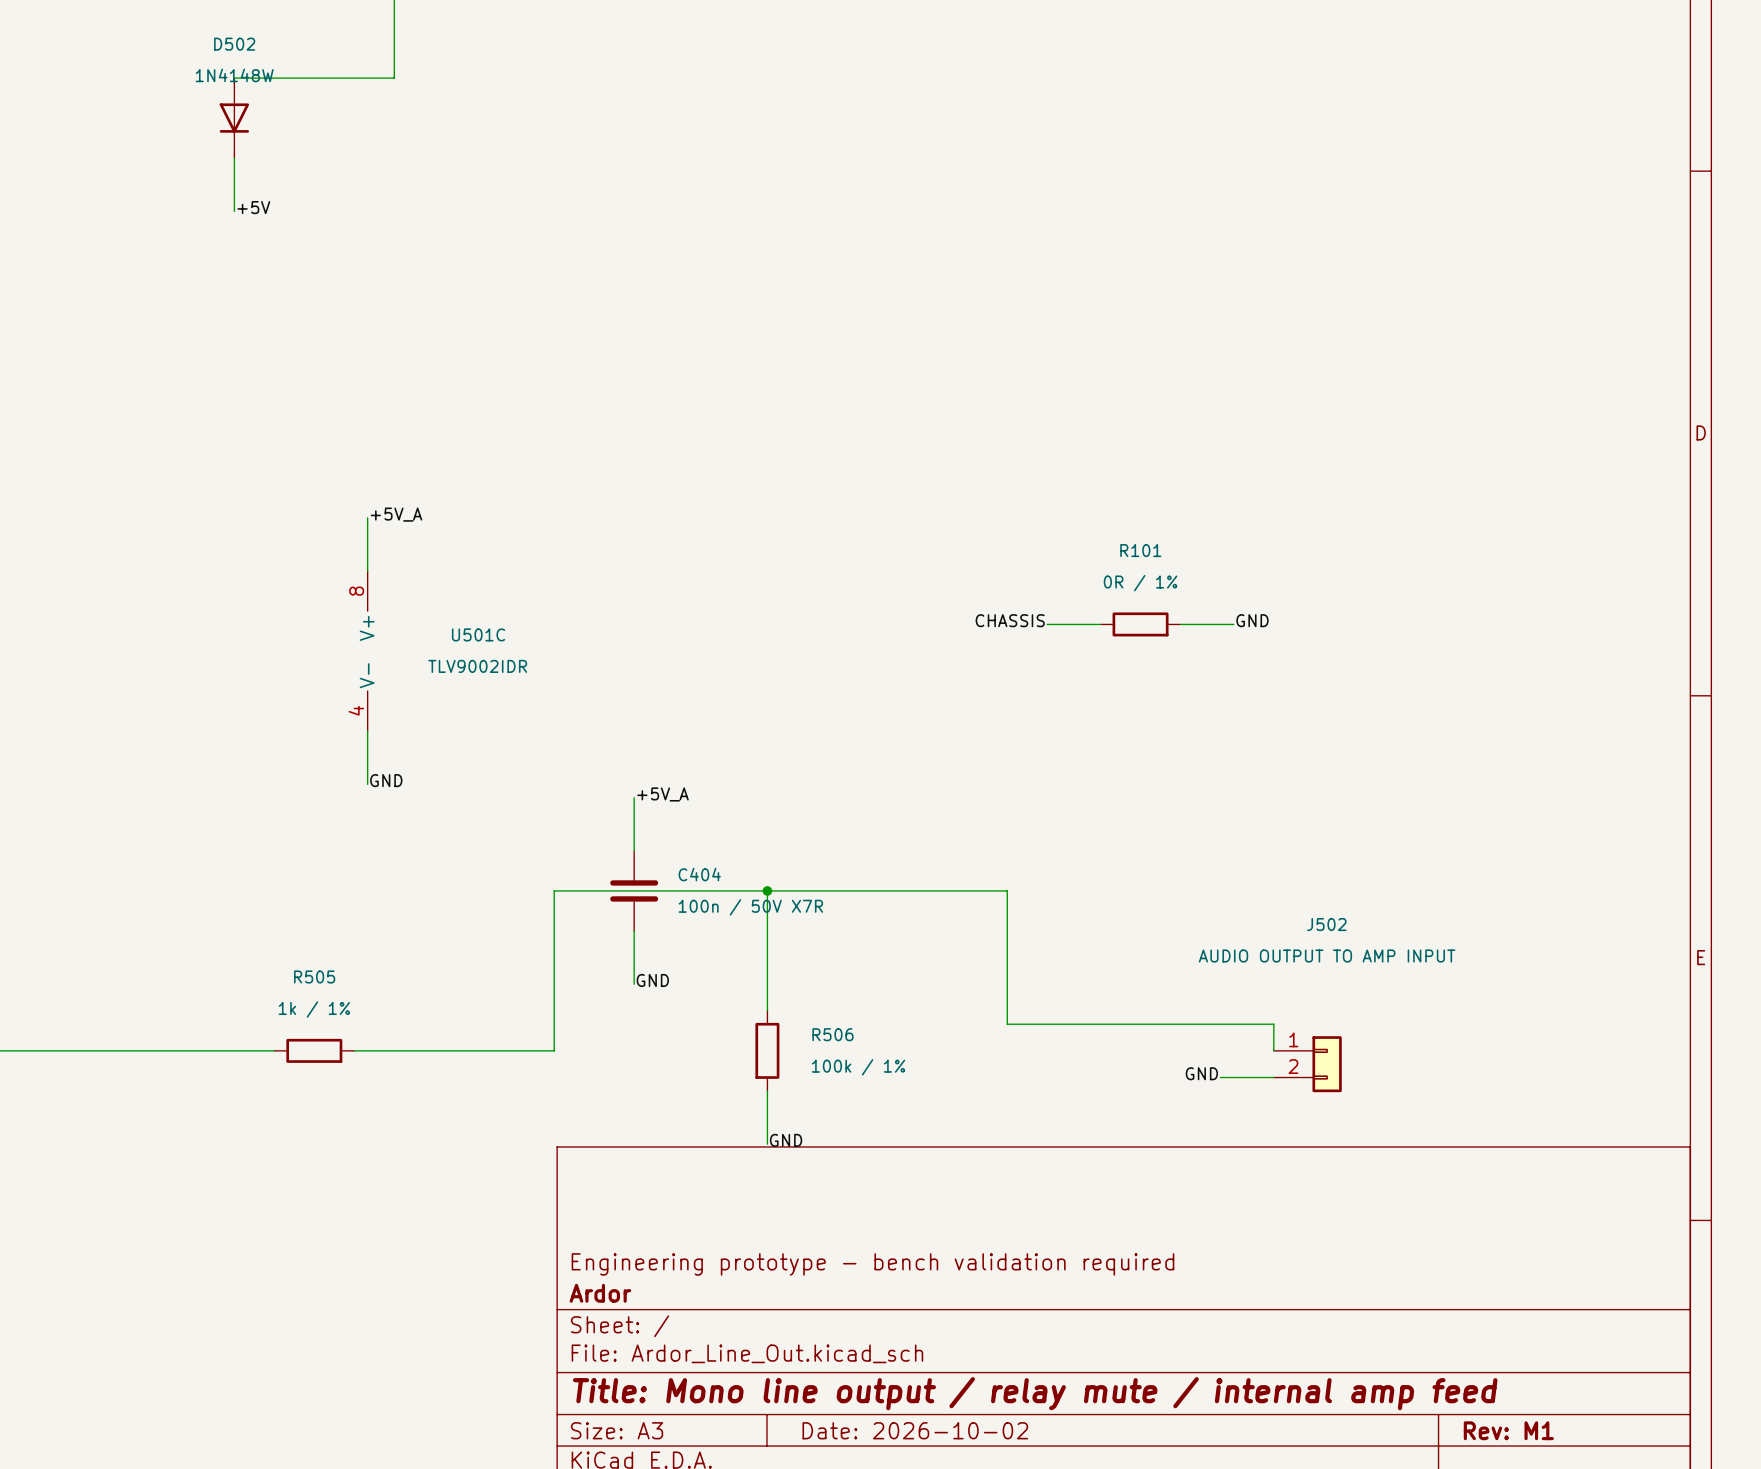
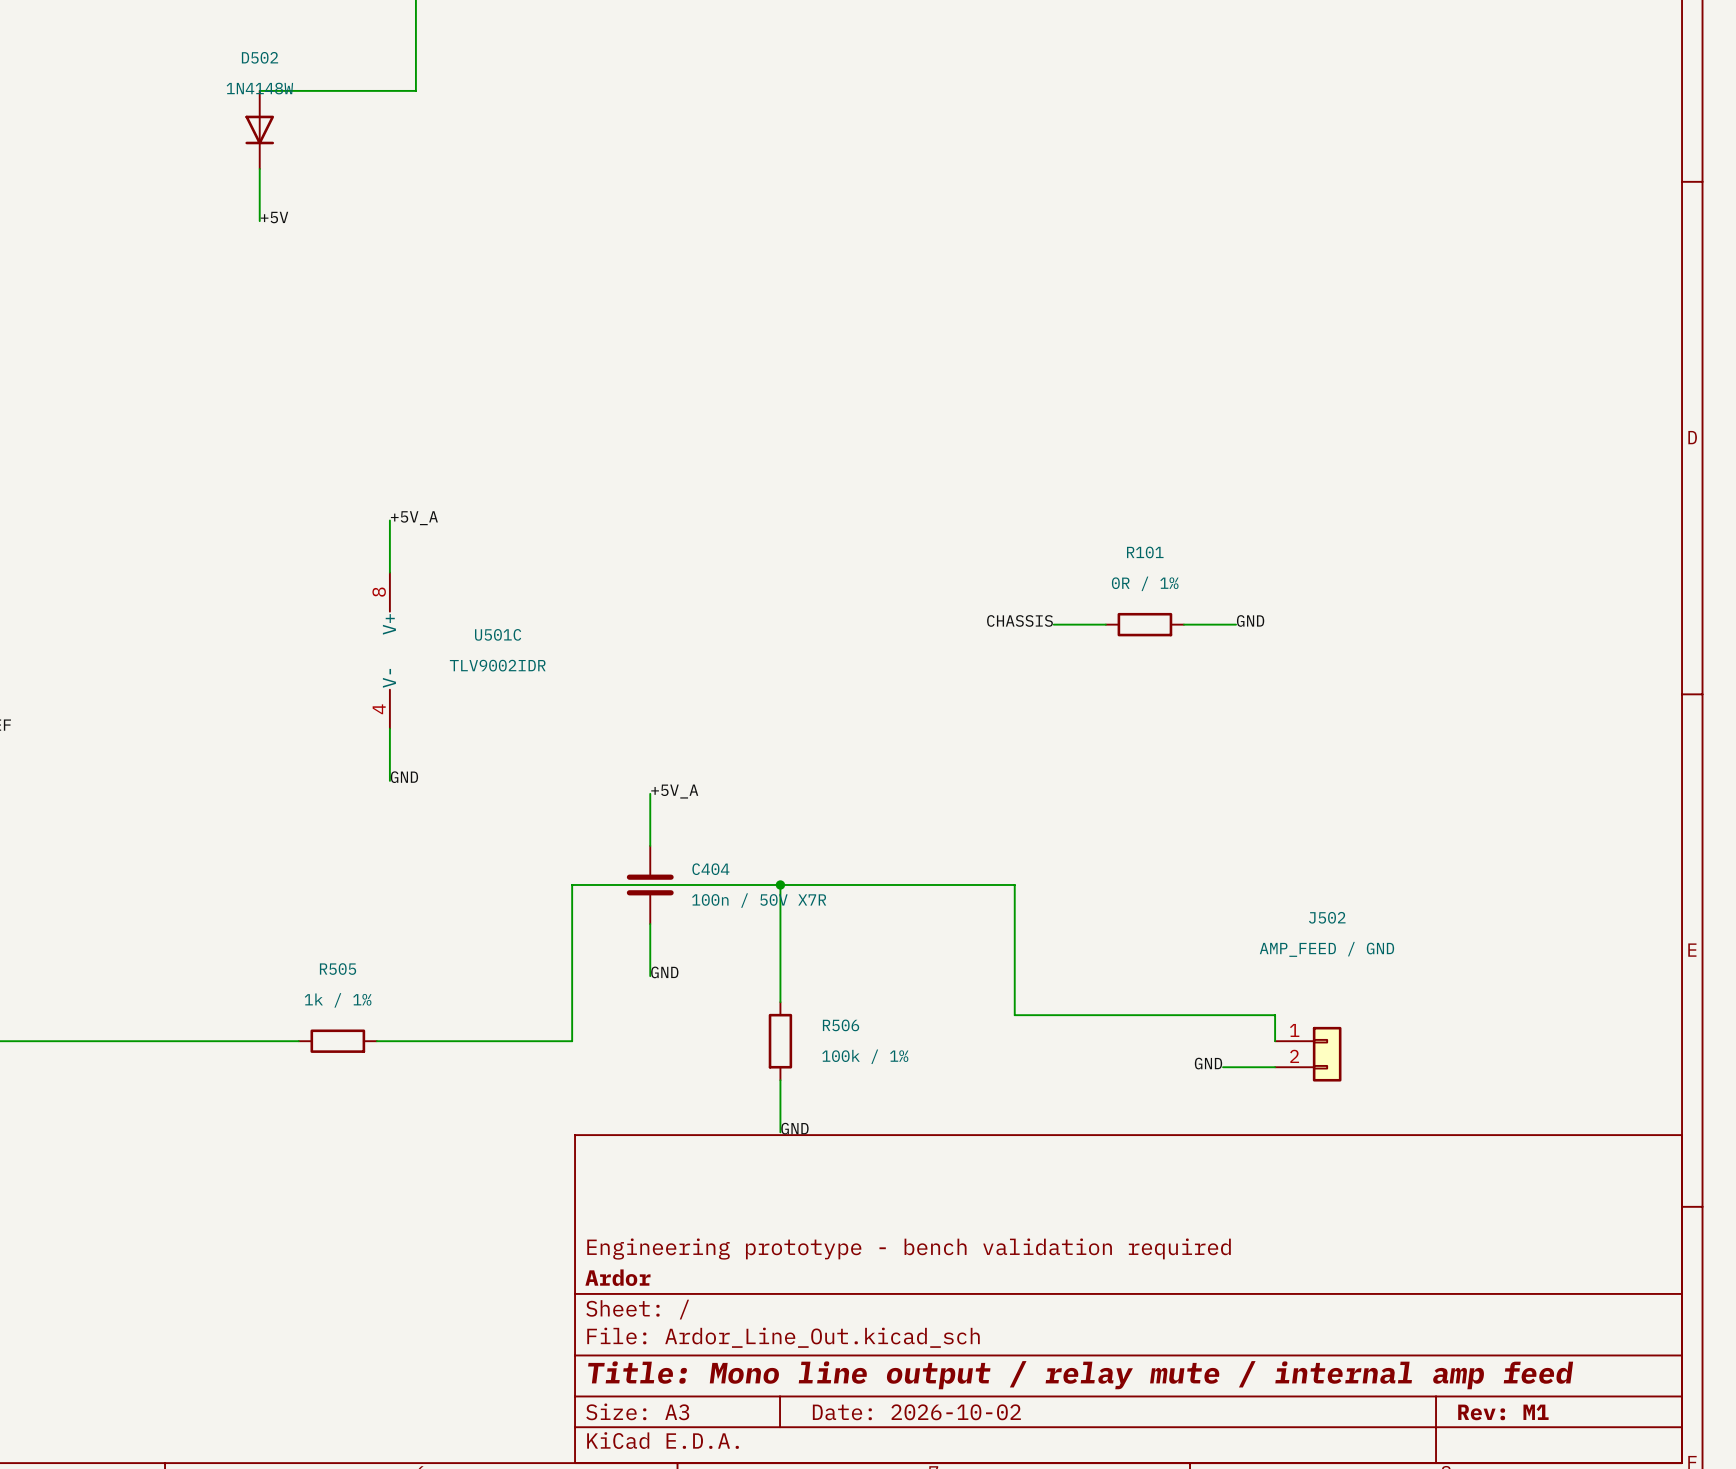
J502 value: AUDIO OUTPUT TO AMP INPUT (1327, 956) -> AMP_FEED / GND (1326, 949)

